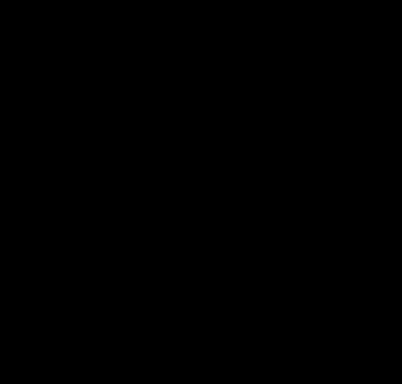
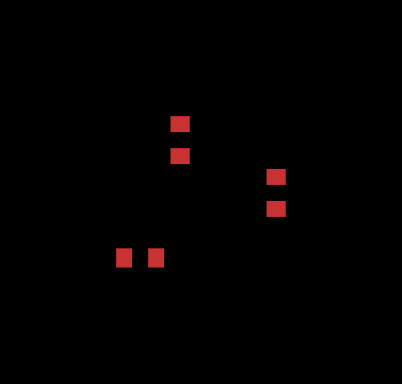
part: none -> (180, 140)
part: none -> (276, 192)
part: none -> (140, 257)

